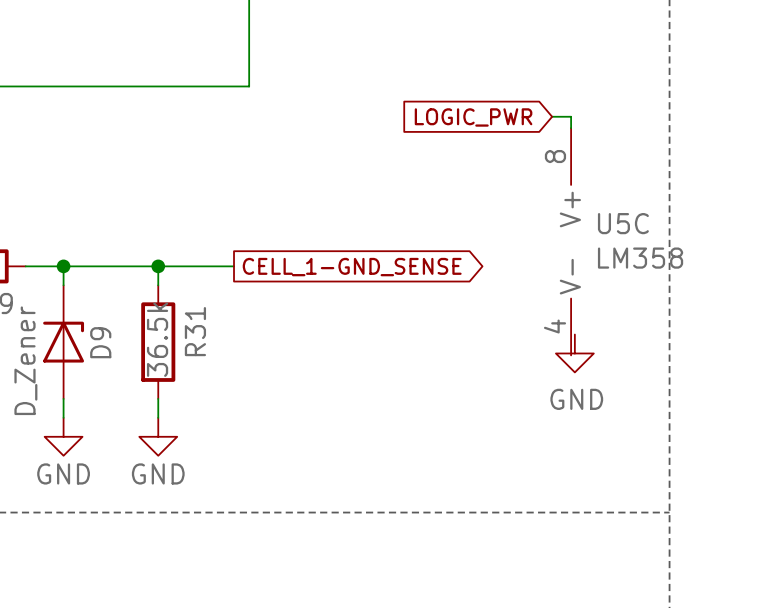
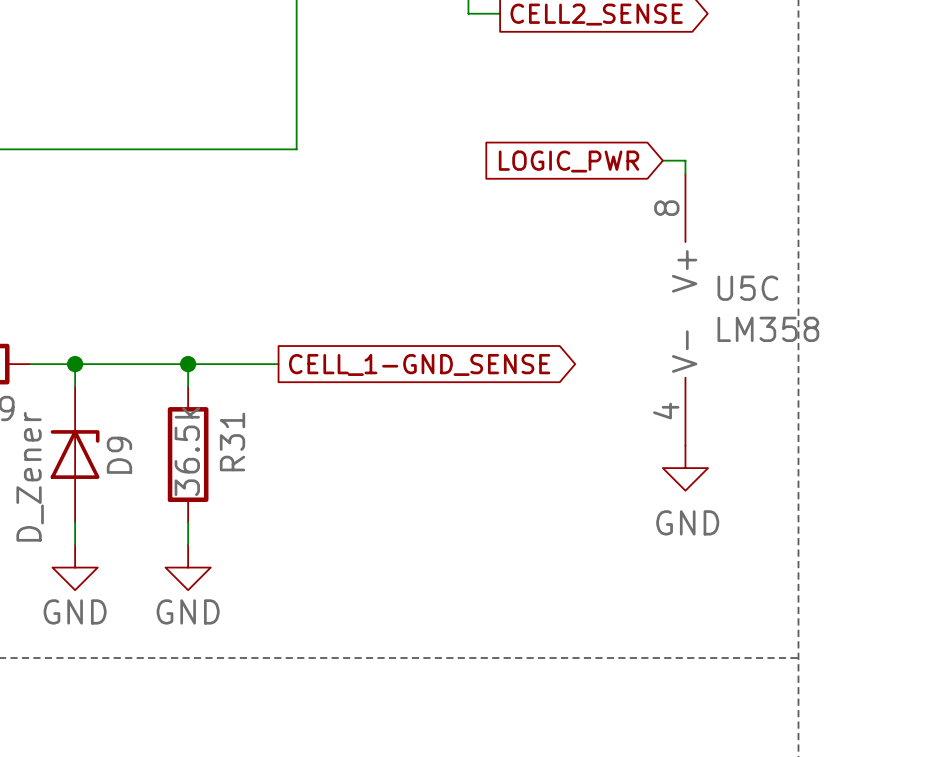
wire: (552, 116) (571, 116) (571, 128) -> (662, 160) (685, 160) (685, 174)
global label position: LOGIC_PWR (473, 117) -> LOGIC_PWR (569, 161)
U5C position: (571, 241) -> (685, 309)

